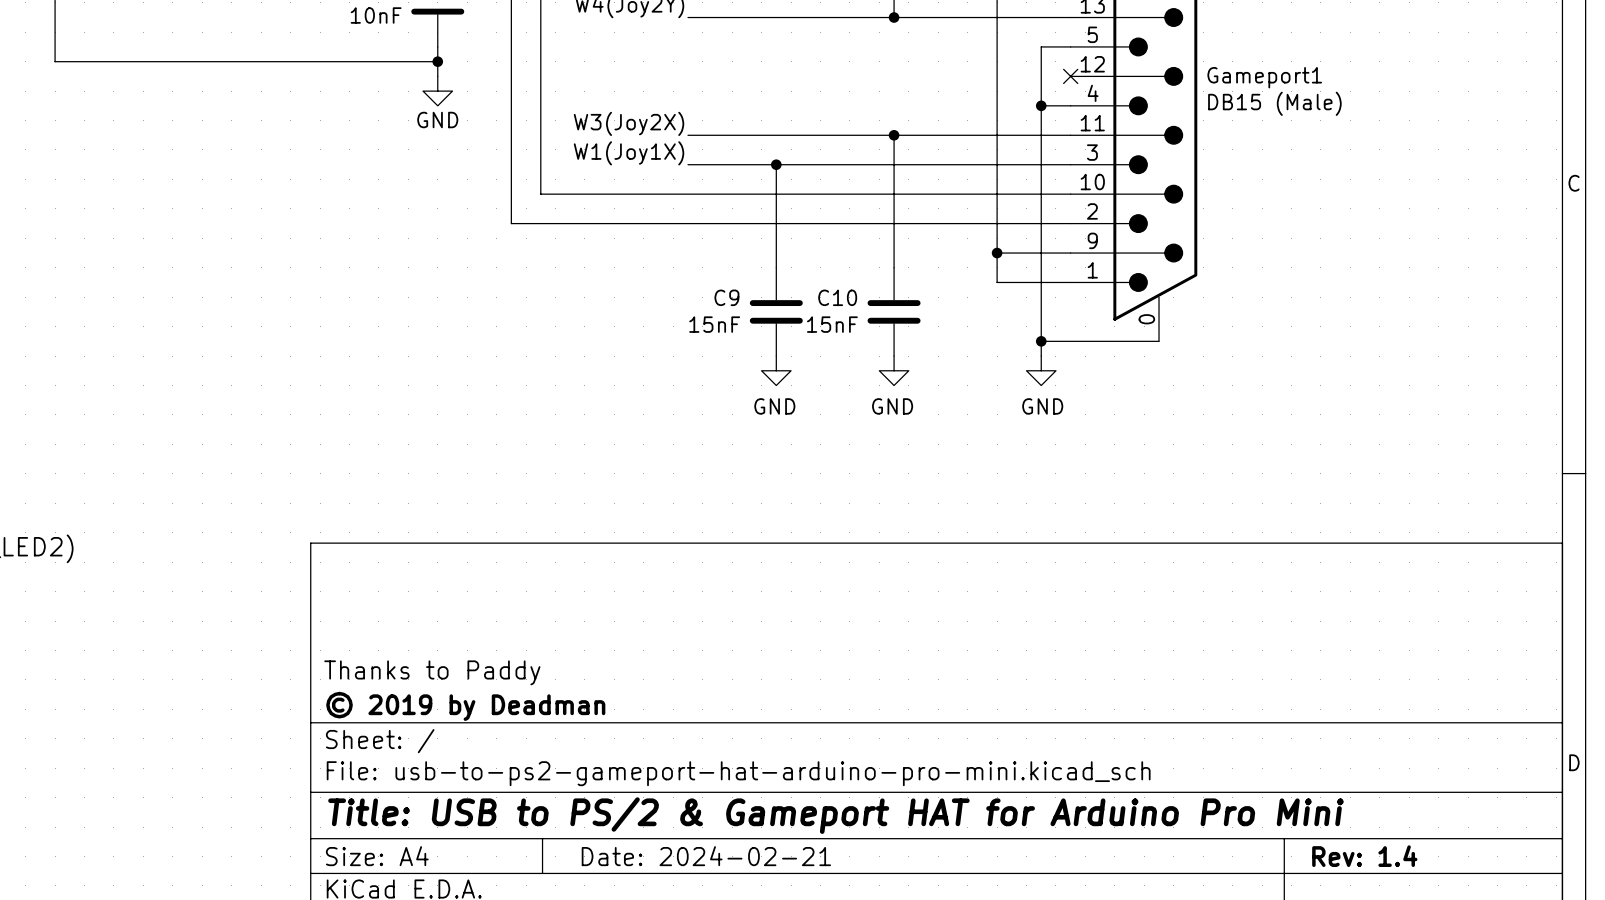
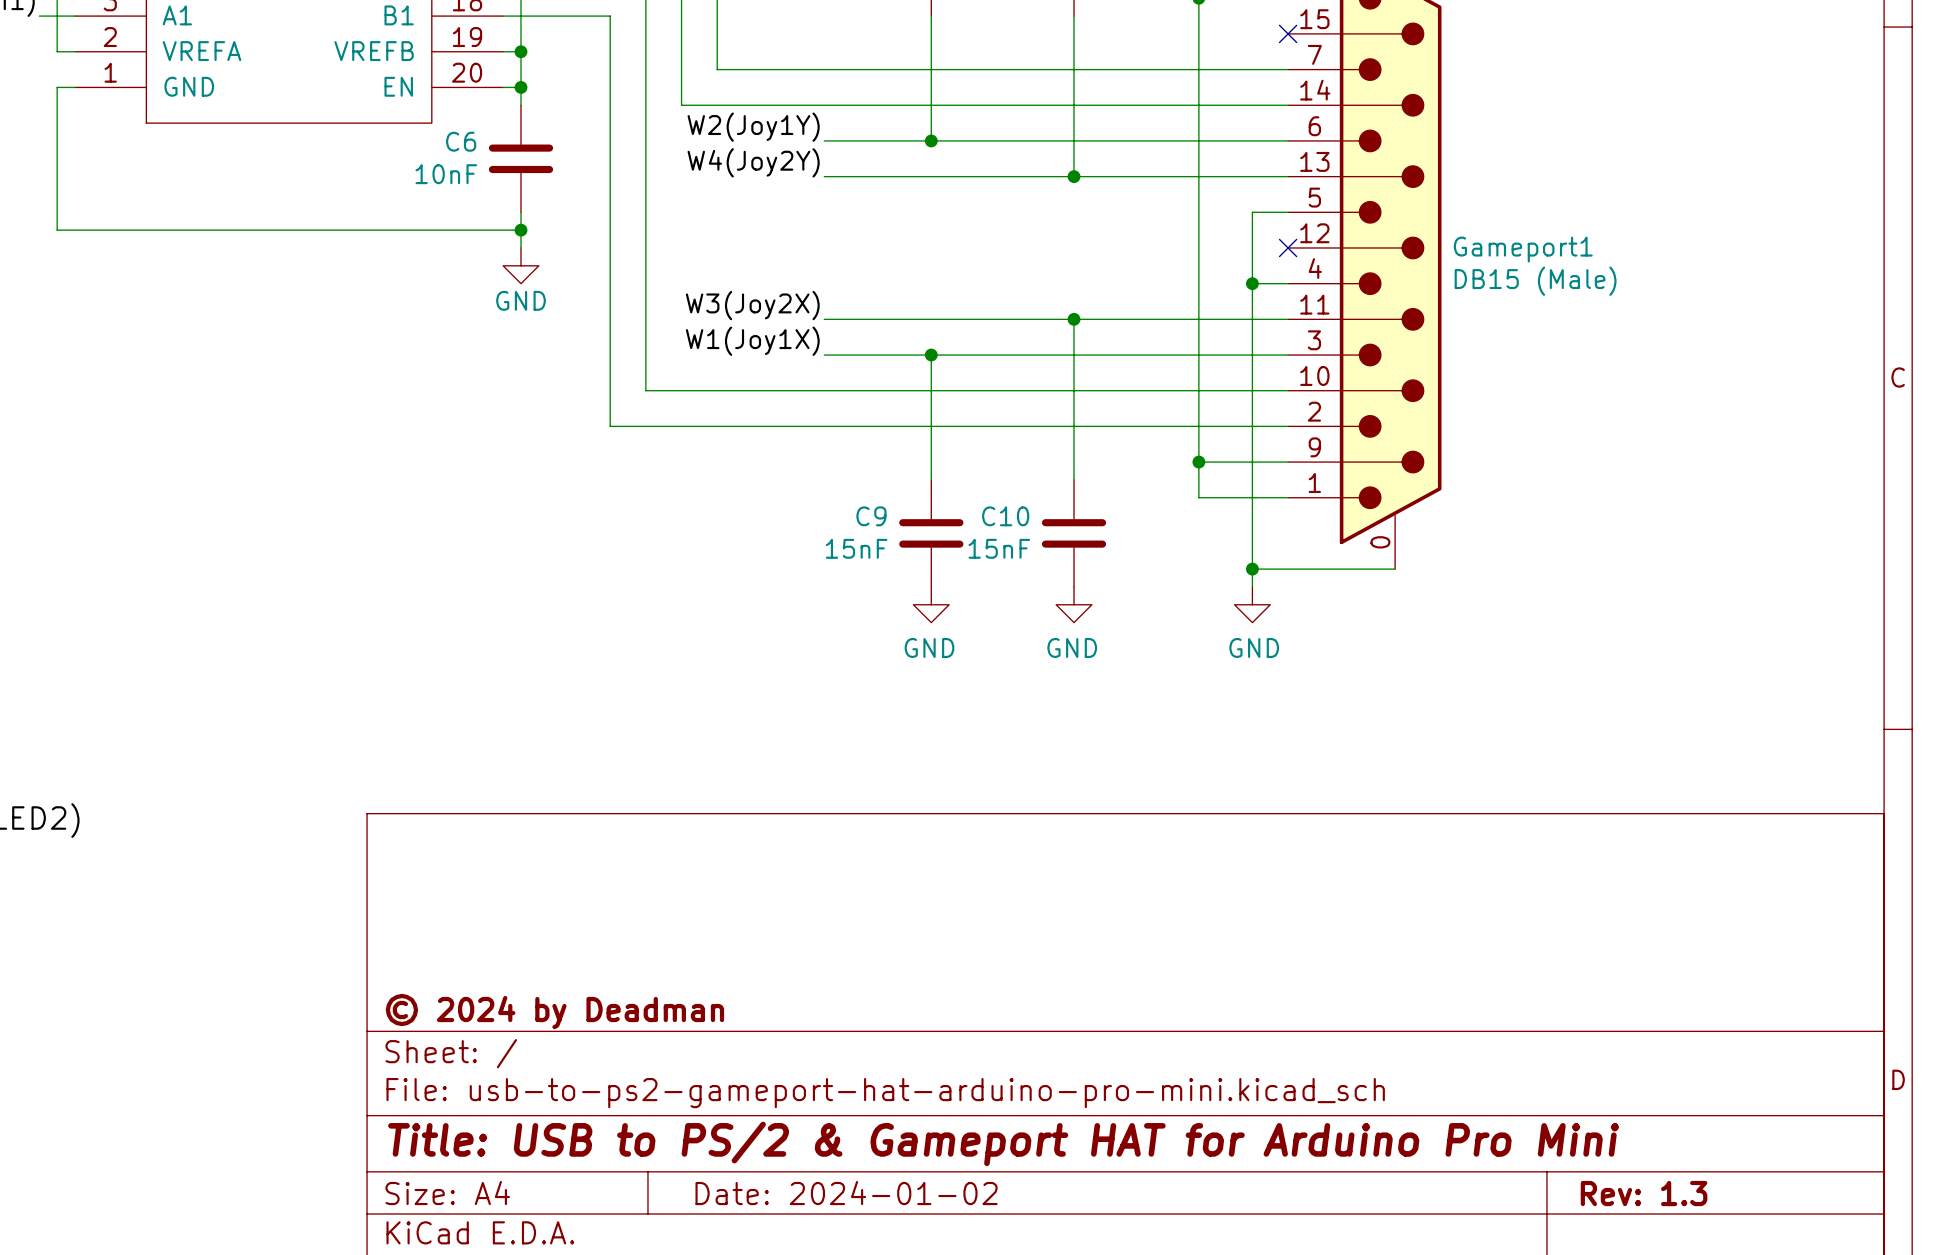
title block: Thanks to Paddy (432, 672) -> none
title block: © 2019 by Deadman (465, 706) -> © 2024 by Deadman (554, 1011)
title block: Date: 2024-02-21 (706, 856) -> Date: 2024-01-02 (846, 1193)
title block: Rev: 1.4 (1364, 856) -> Rev: 1.3 (1644, 1193)

